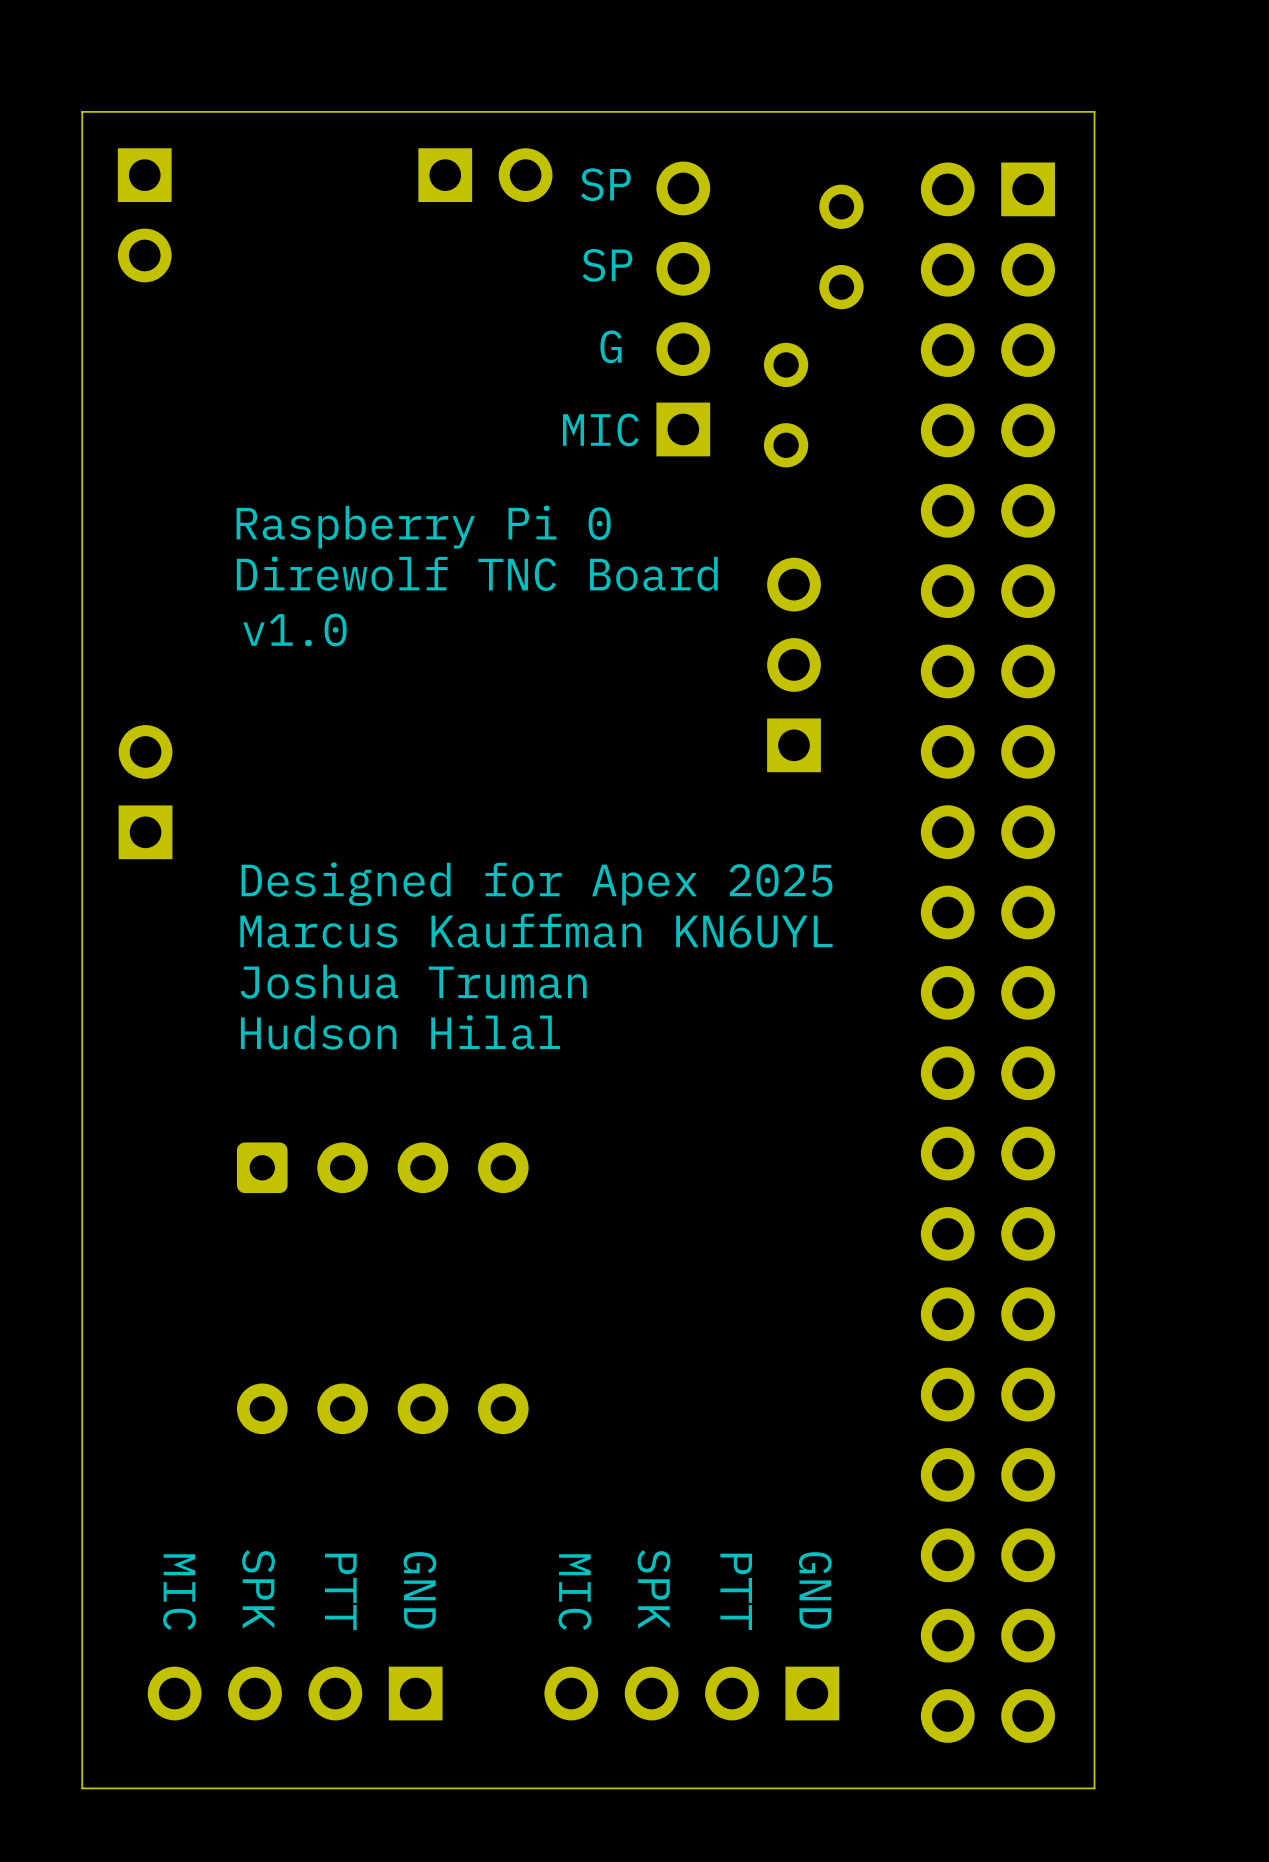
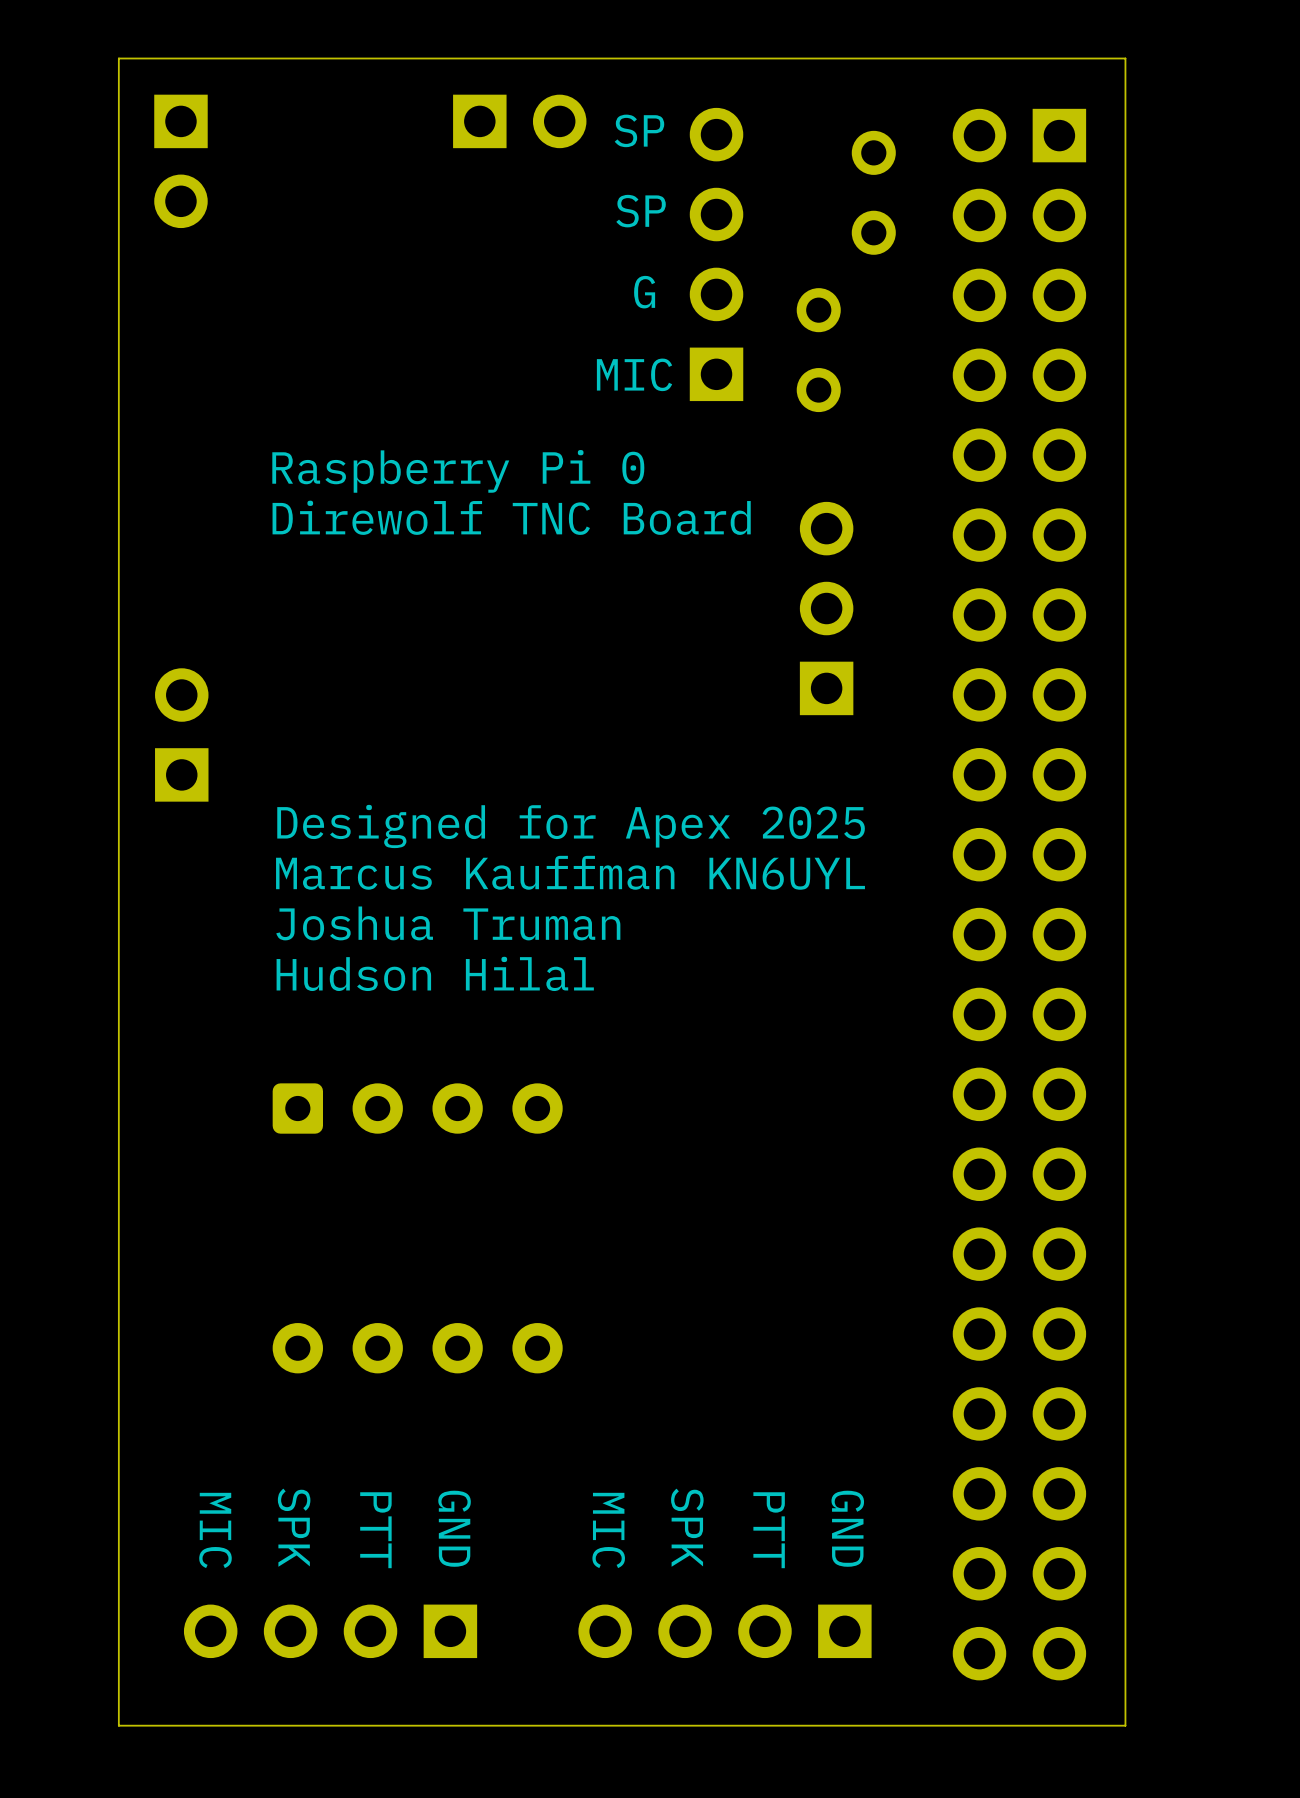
text: v1.0 (295, 629) -> none

